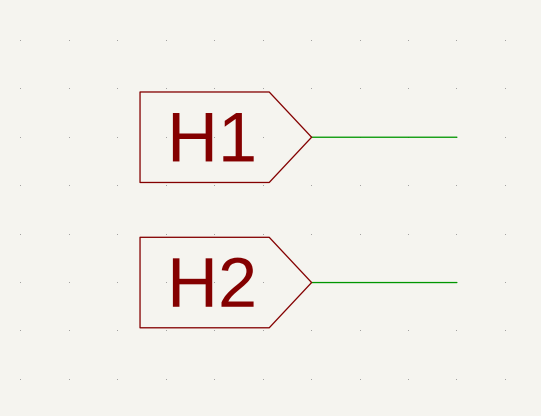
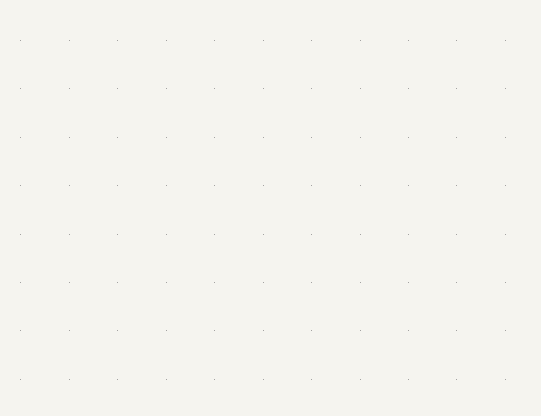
global label: H1 (213, 137) -> none
wire: (311, 137) (456, 137) -> none
global label: H2 (213, 282) -> none
wire: (311, 282) (456, 282) -> none

